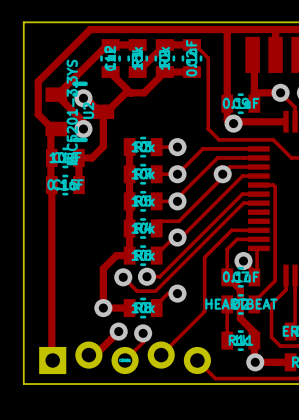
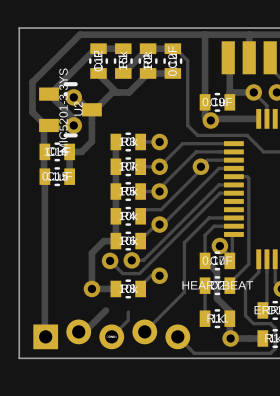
via: (118, 331) -> none
via: (143, 333) -> none

